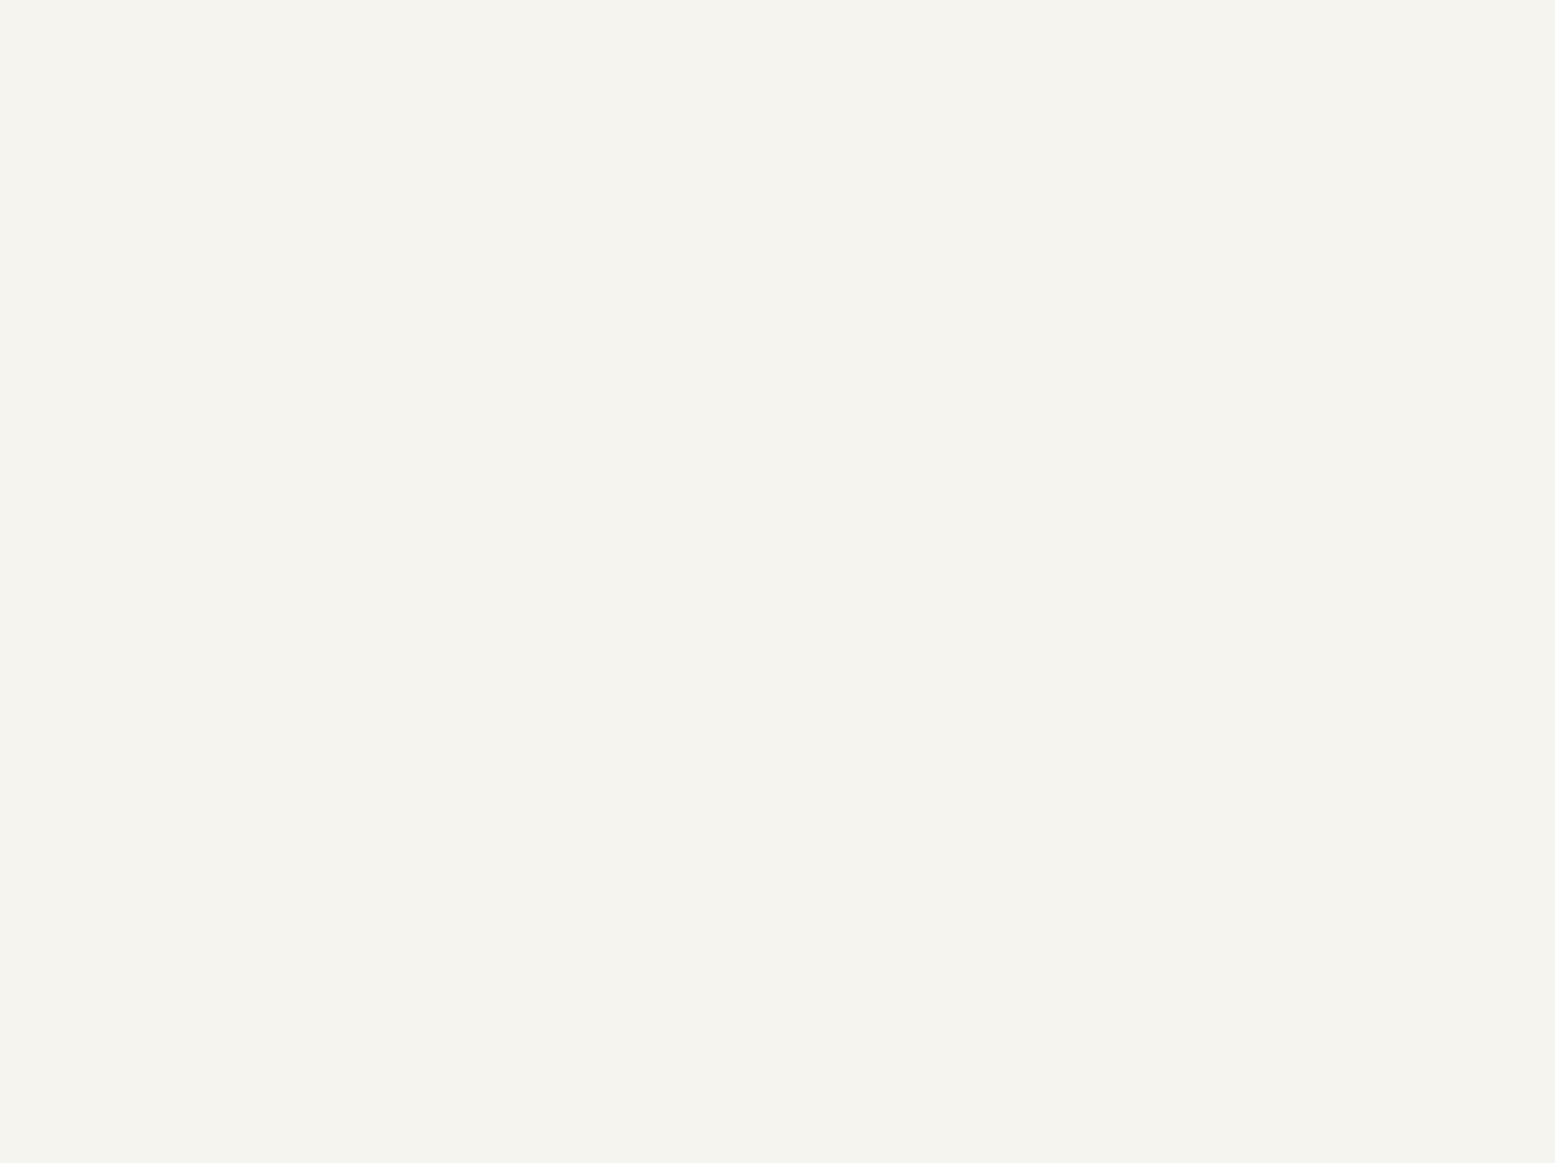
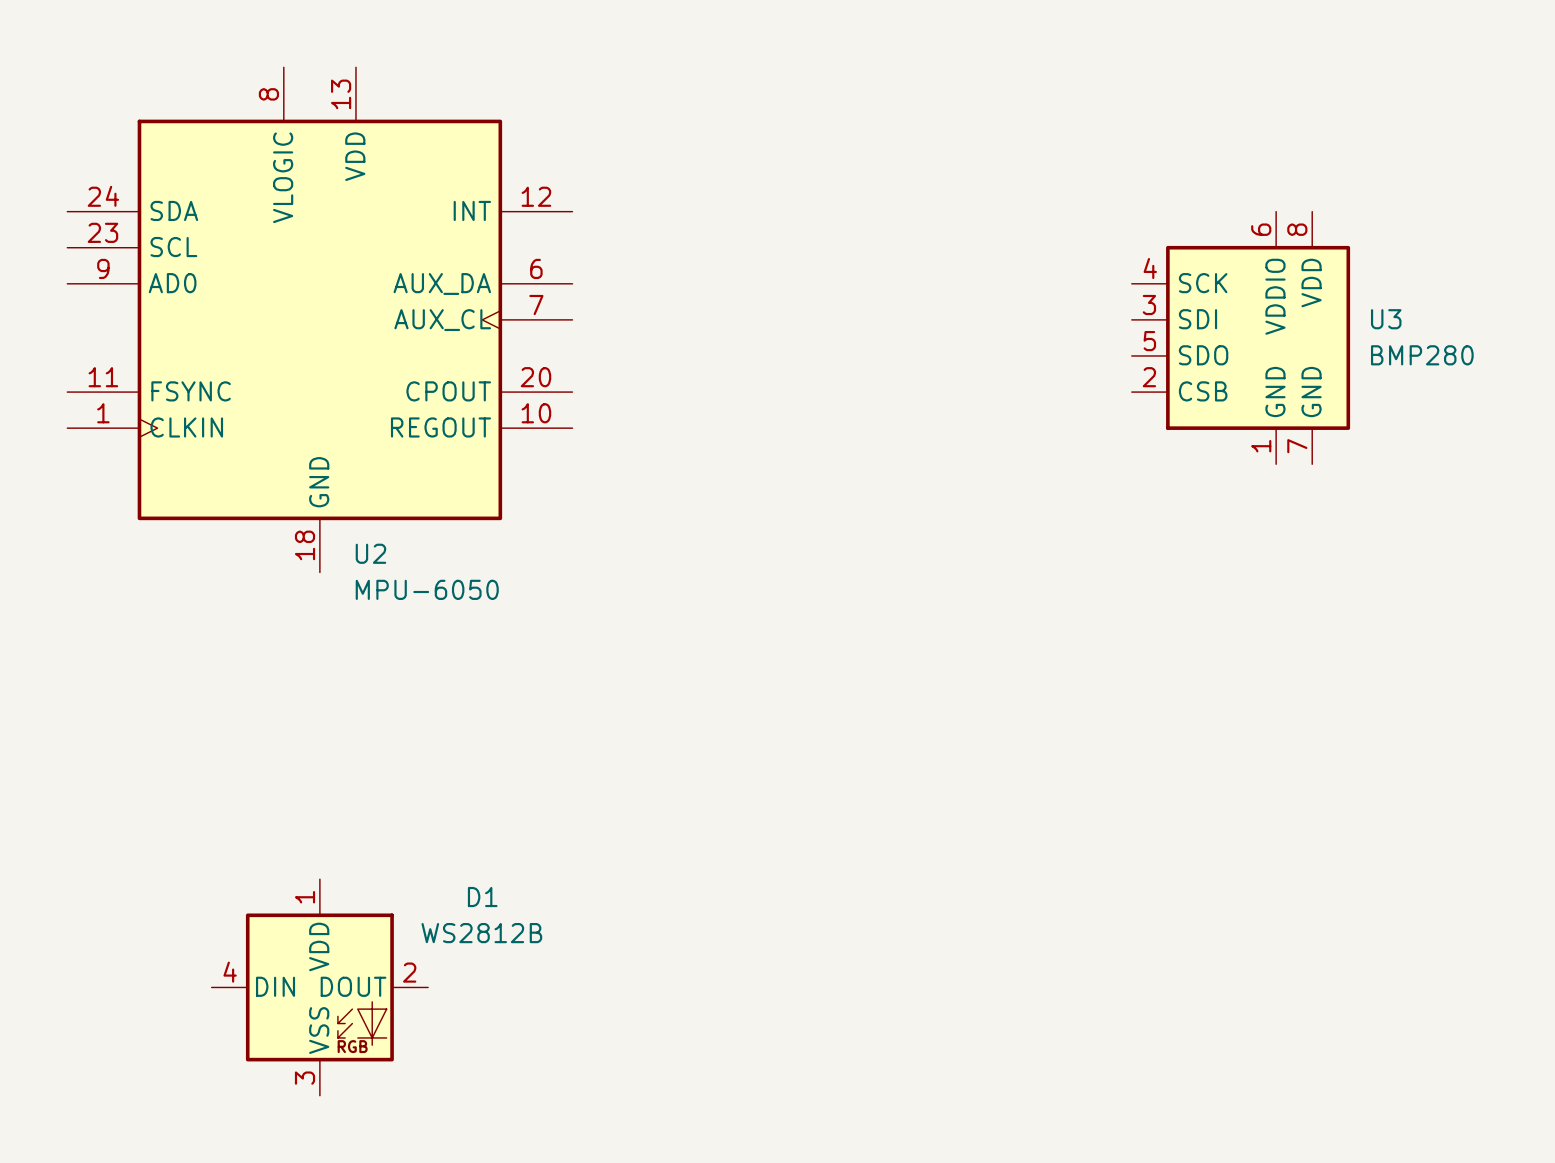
U2: none -> MPU-6050 (319, 319)
U3: none -> BMP280 (1240, 337)
D1: none -> WS2812B (319, 987)

